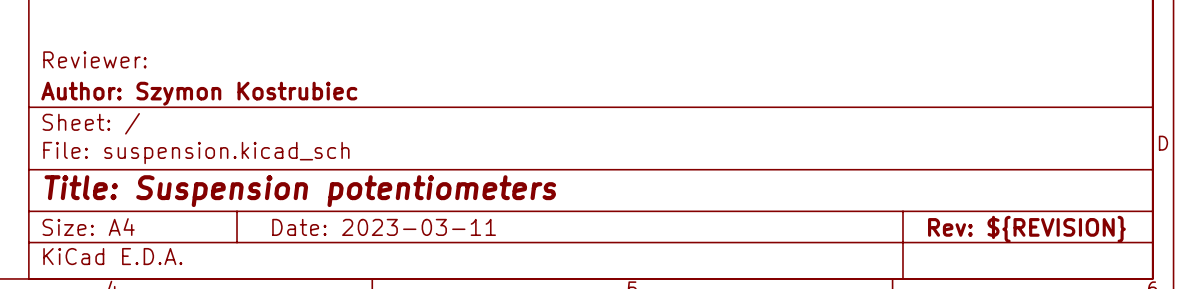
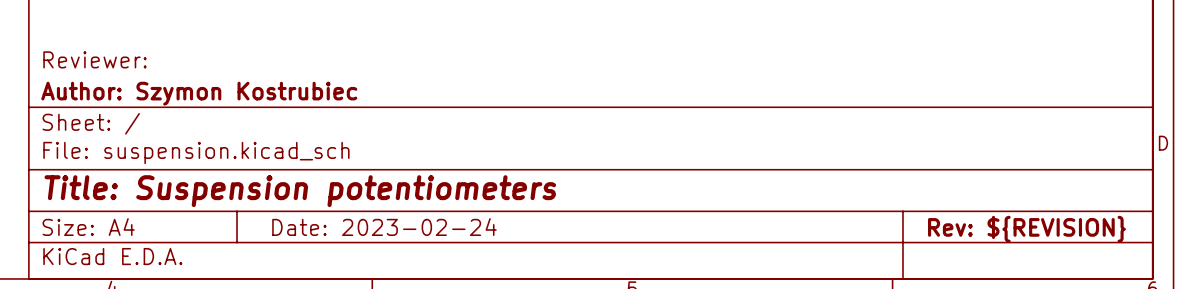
title block: Date: 2023-03-11 (384, 227) -> Date: 2023-02-24 (384, 227)

